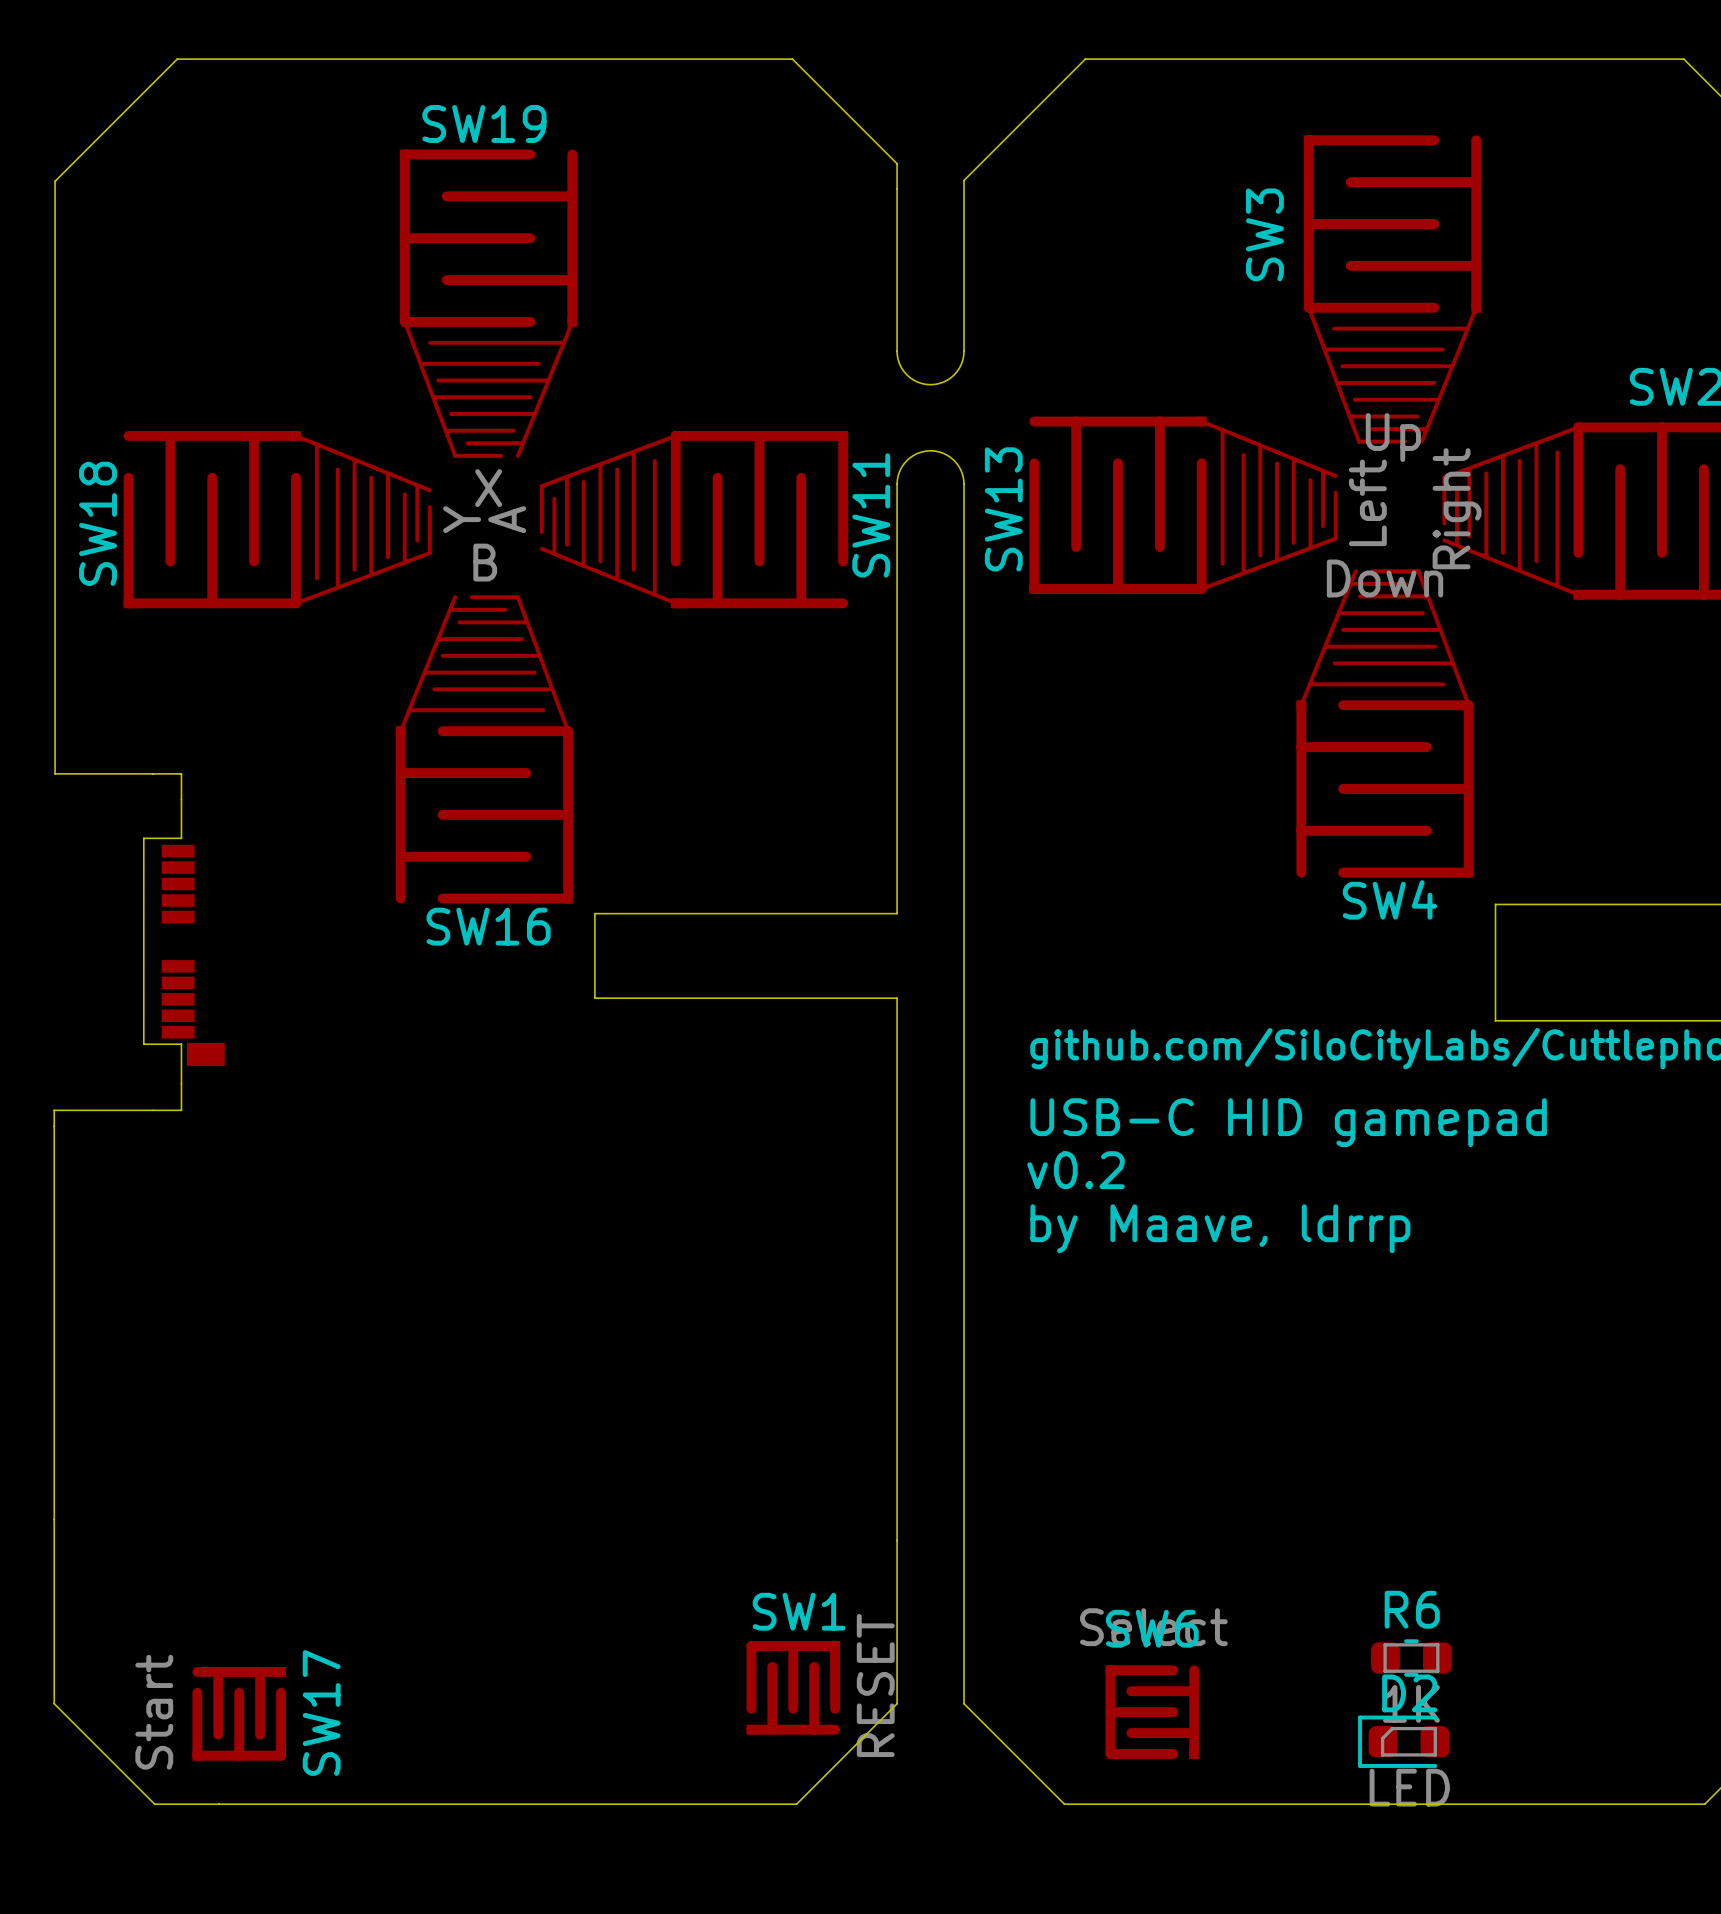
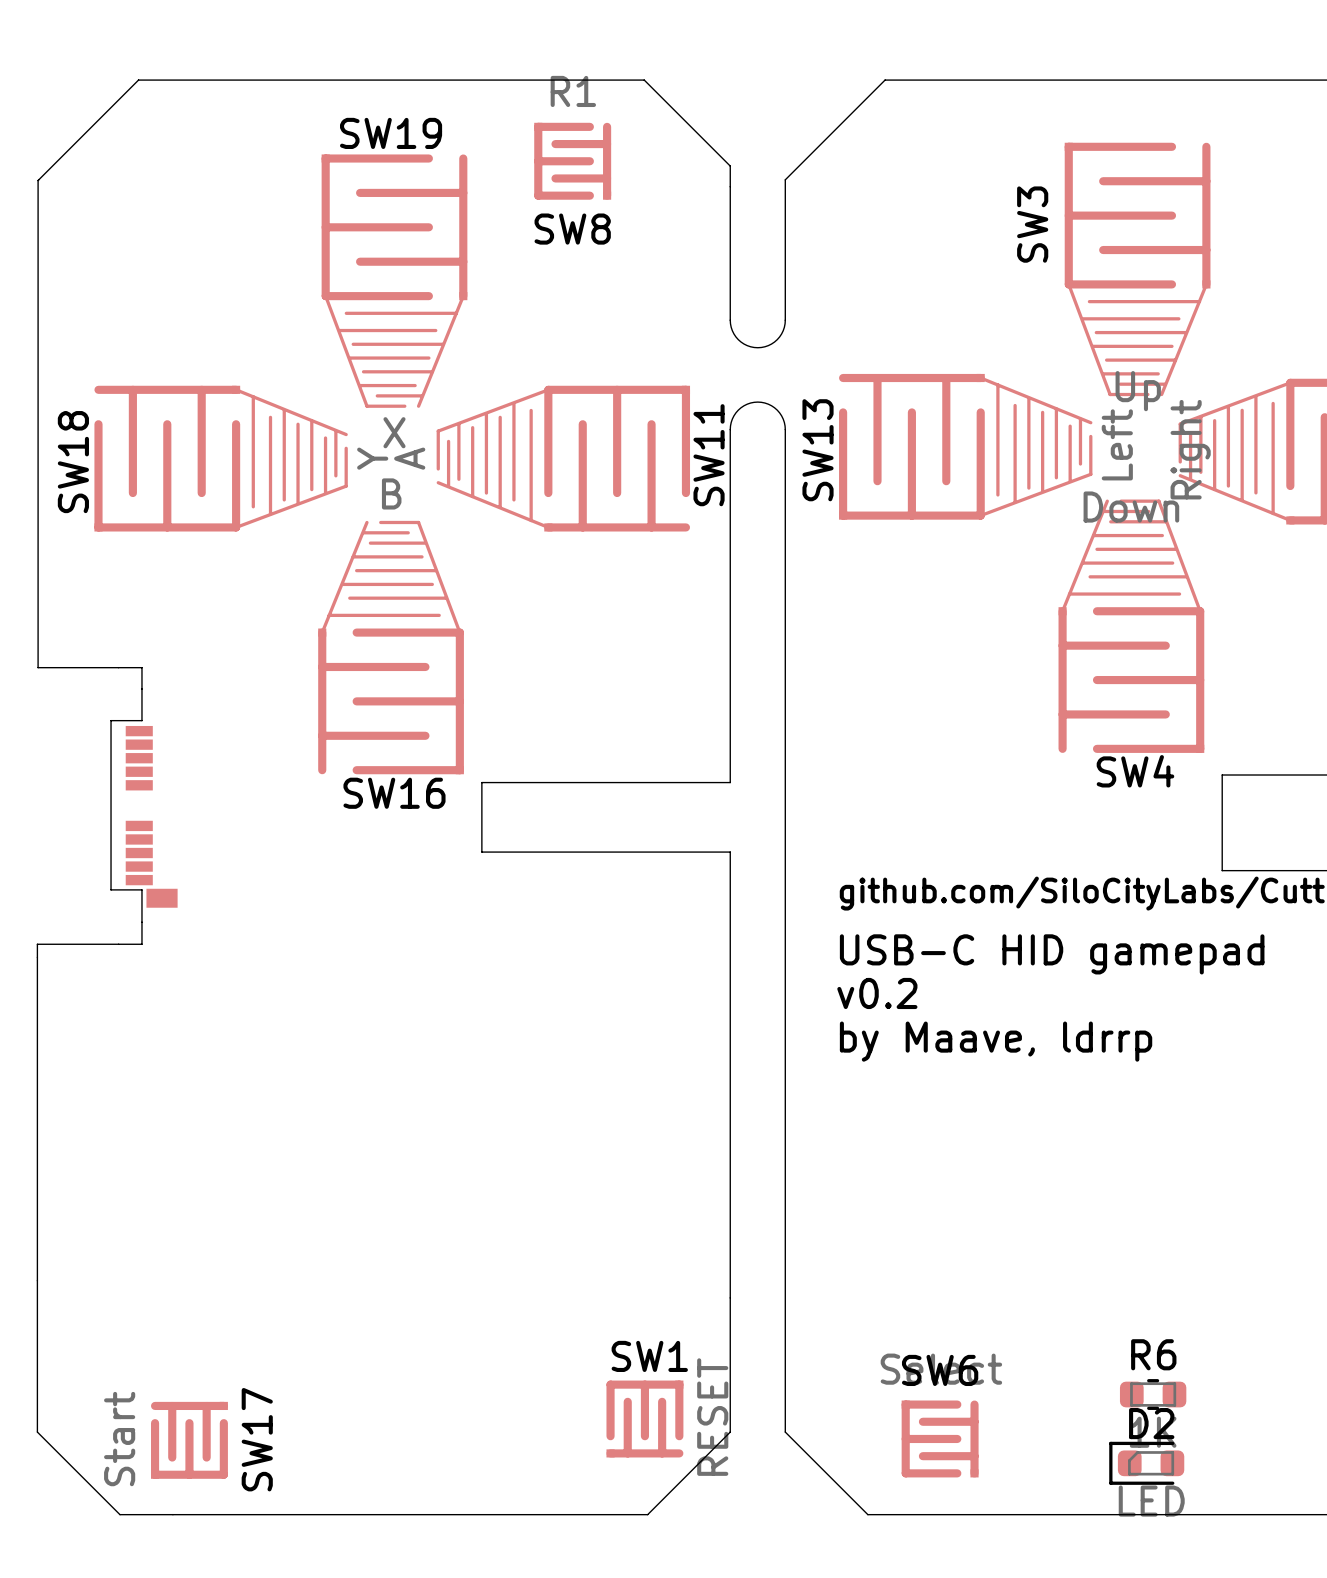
SW8: none -> R1 (572, 161)

